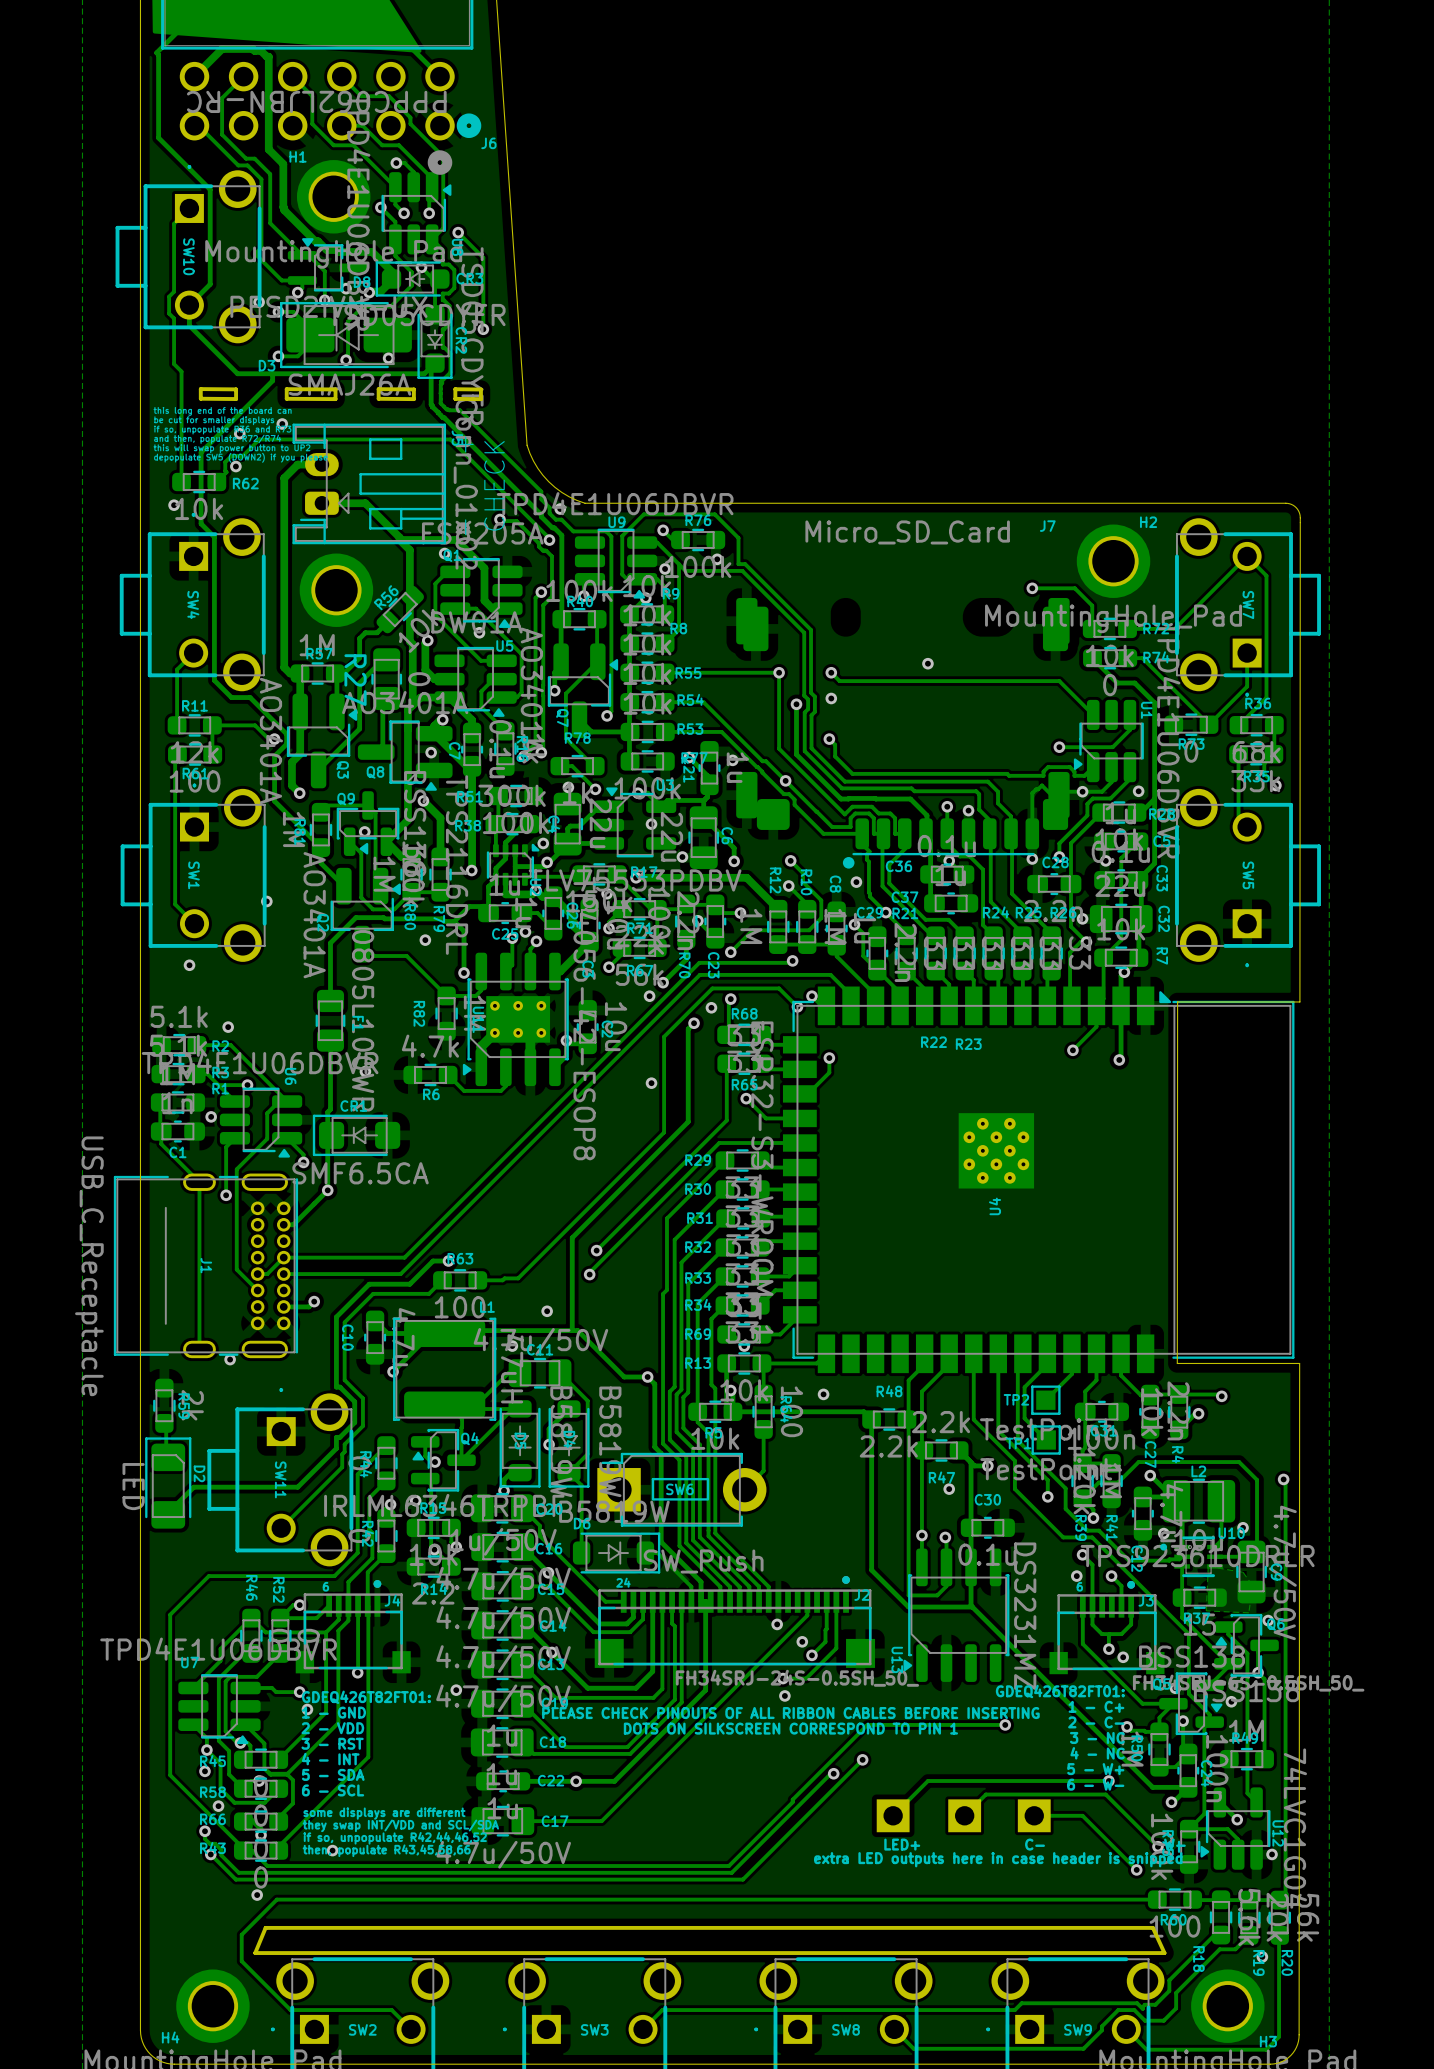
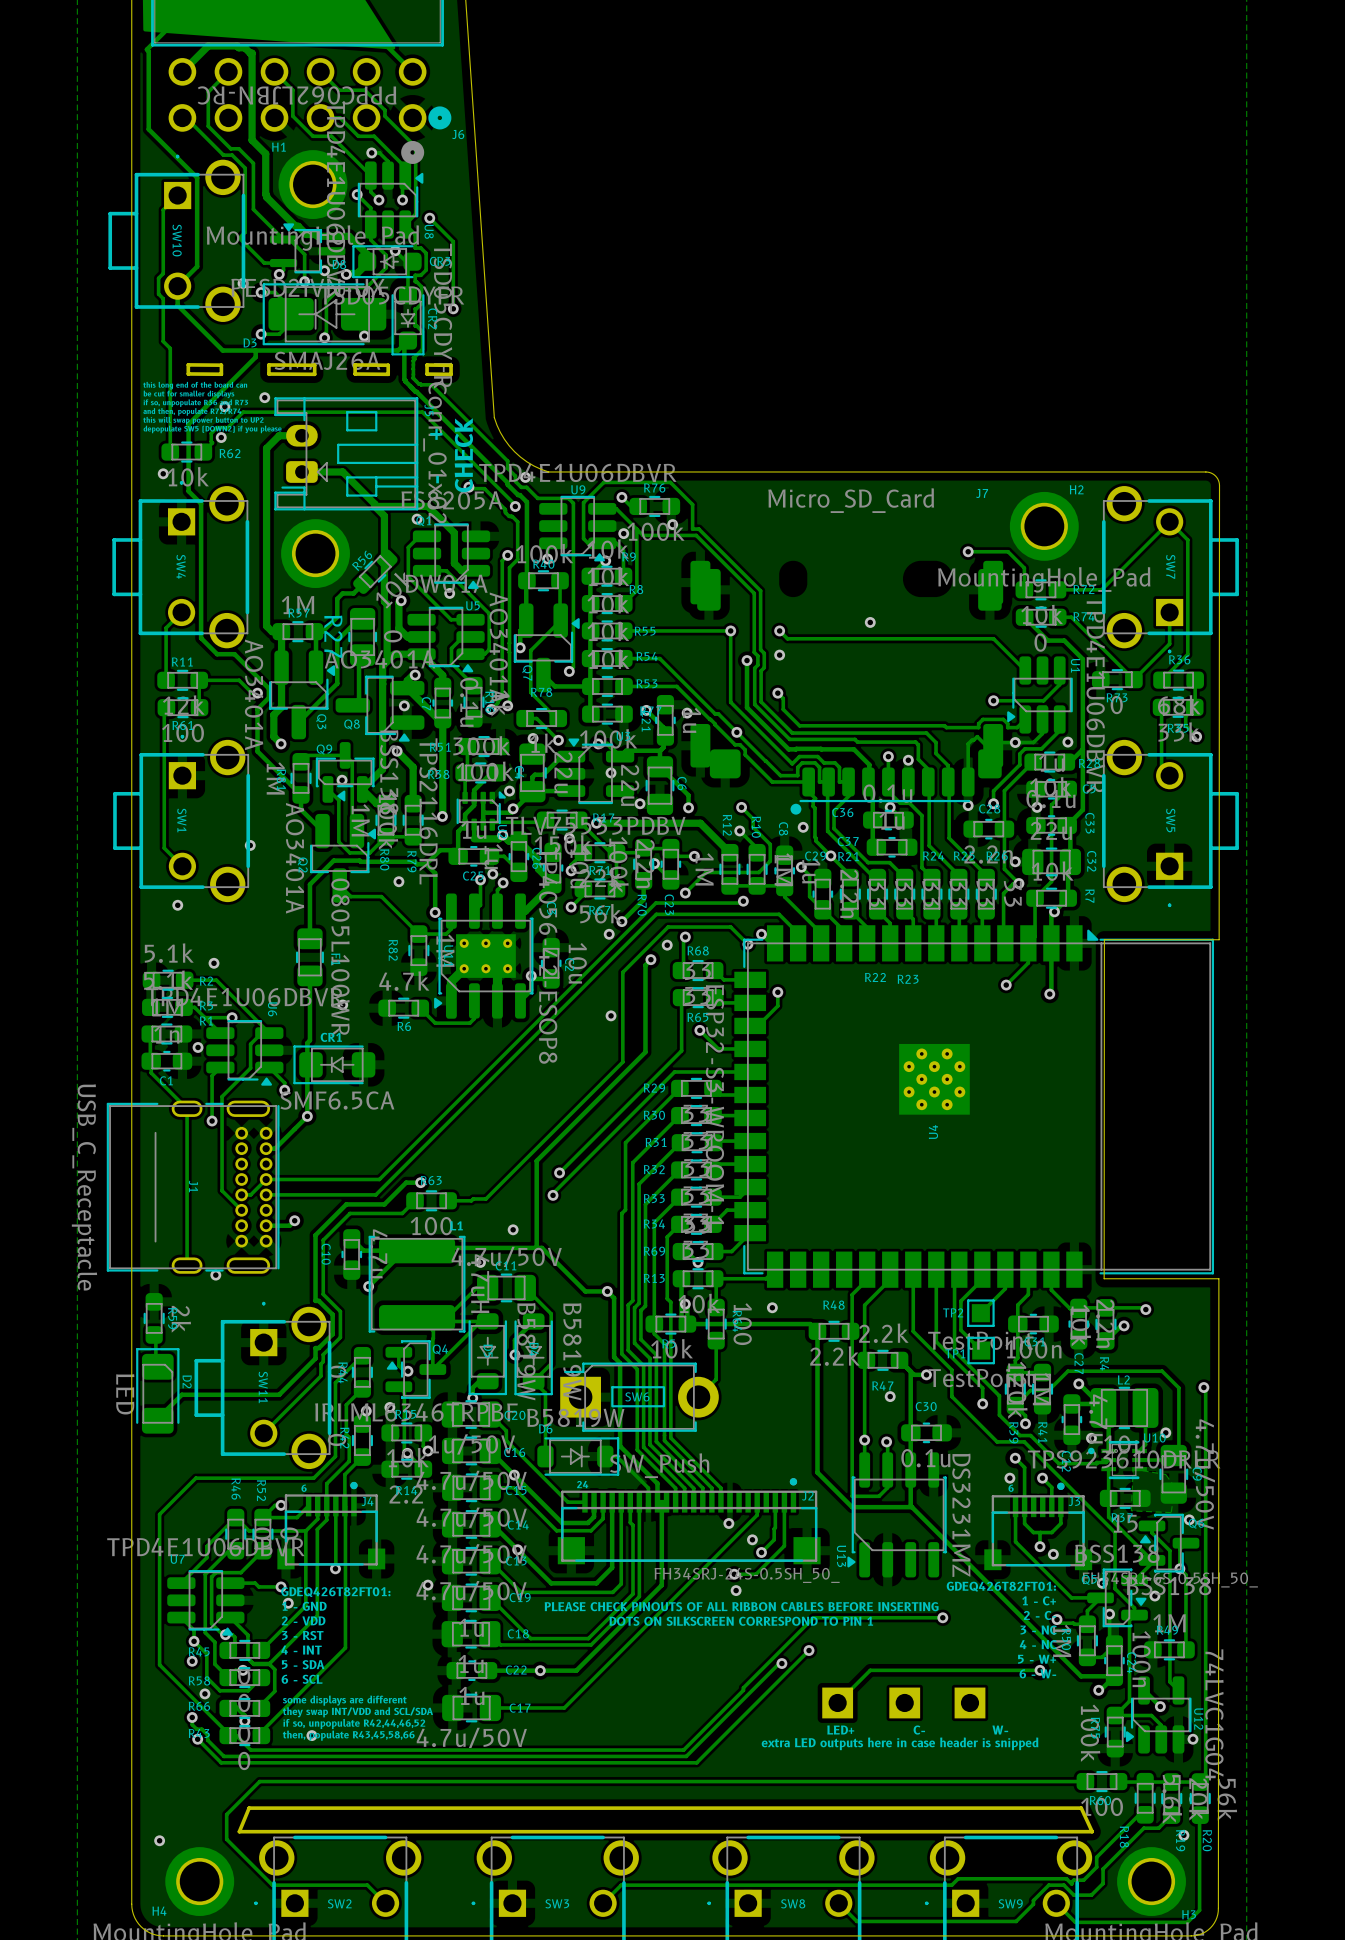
track: (964, 1815) (985, 1794) (1105, 1794) (1157, 1846) -> none
track: (1034, 1815) (1082, 1815) (1136, 1869) -> none
via: (1157, 1846) -> none
via: (1136, 1869) -> none
via position: (257, 1895) -> (159, 1840)

